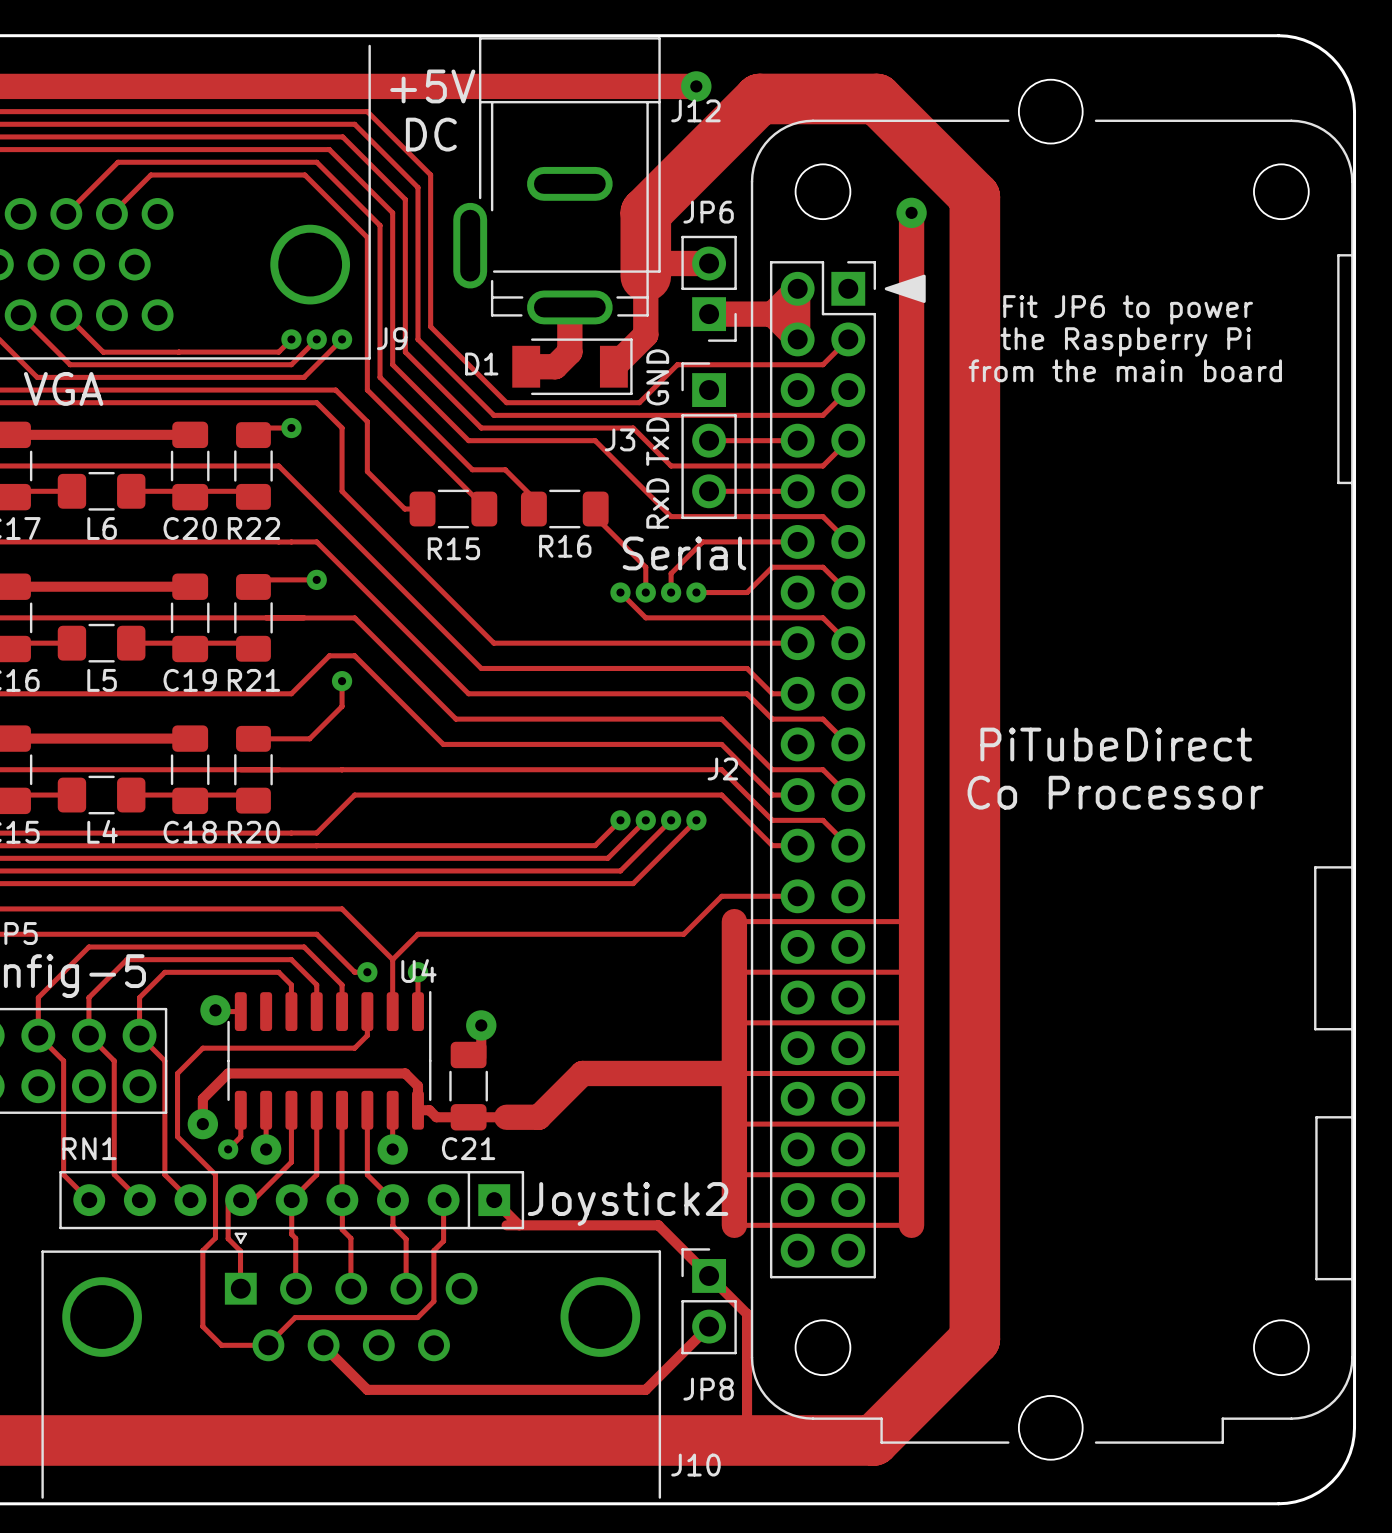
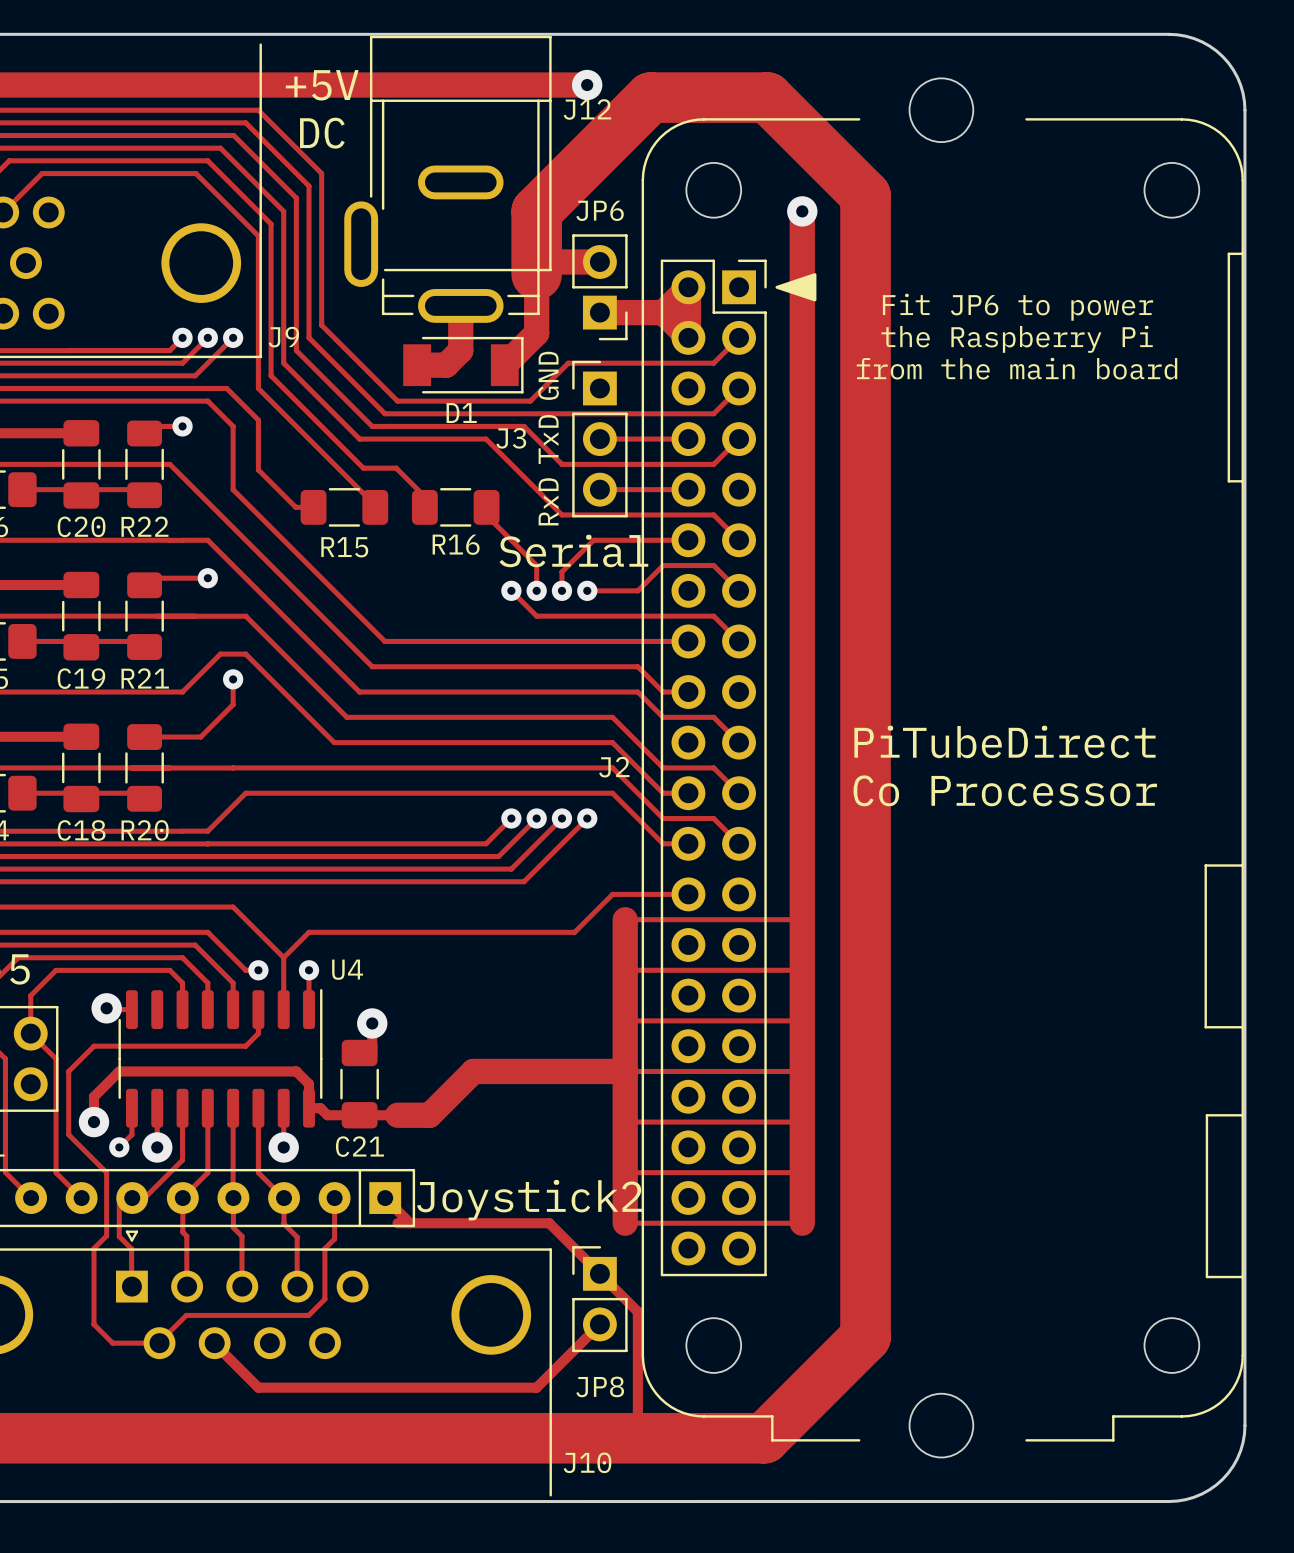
J2 footprint: [750, 119, 1354, 1444] -> [641, 118, 1244, 1442]
D1 name position: D1 (481, 364) -> D1 (461, 413)
U4 name position: U4 (418, 971) -> U4 (347, 969)

